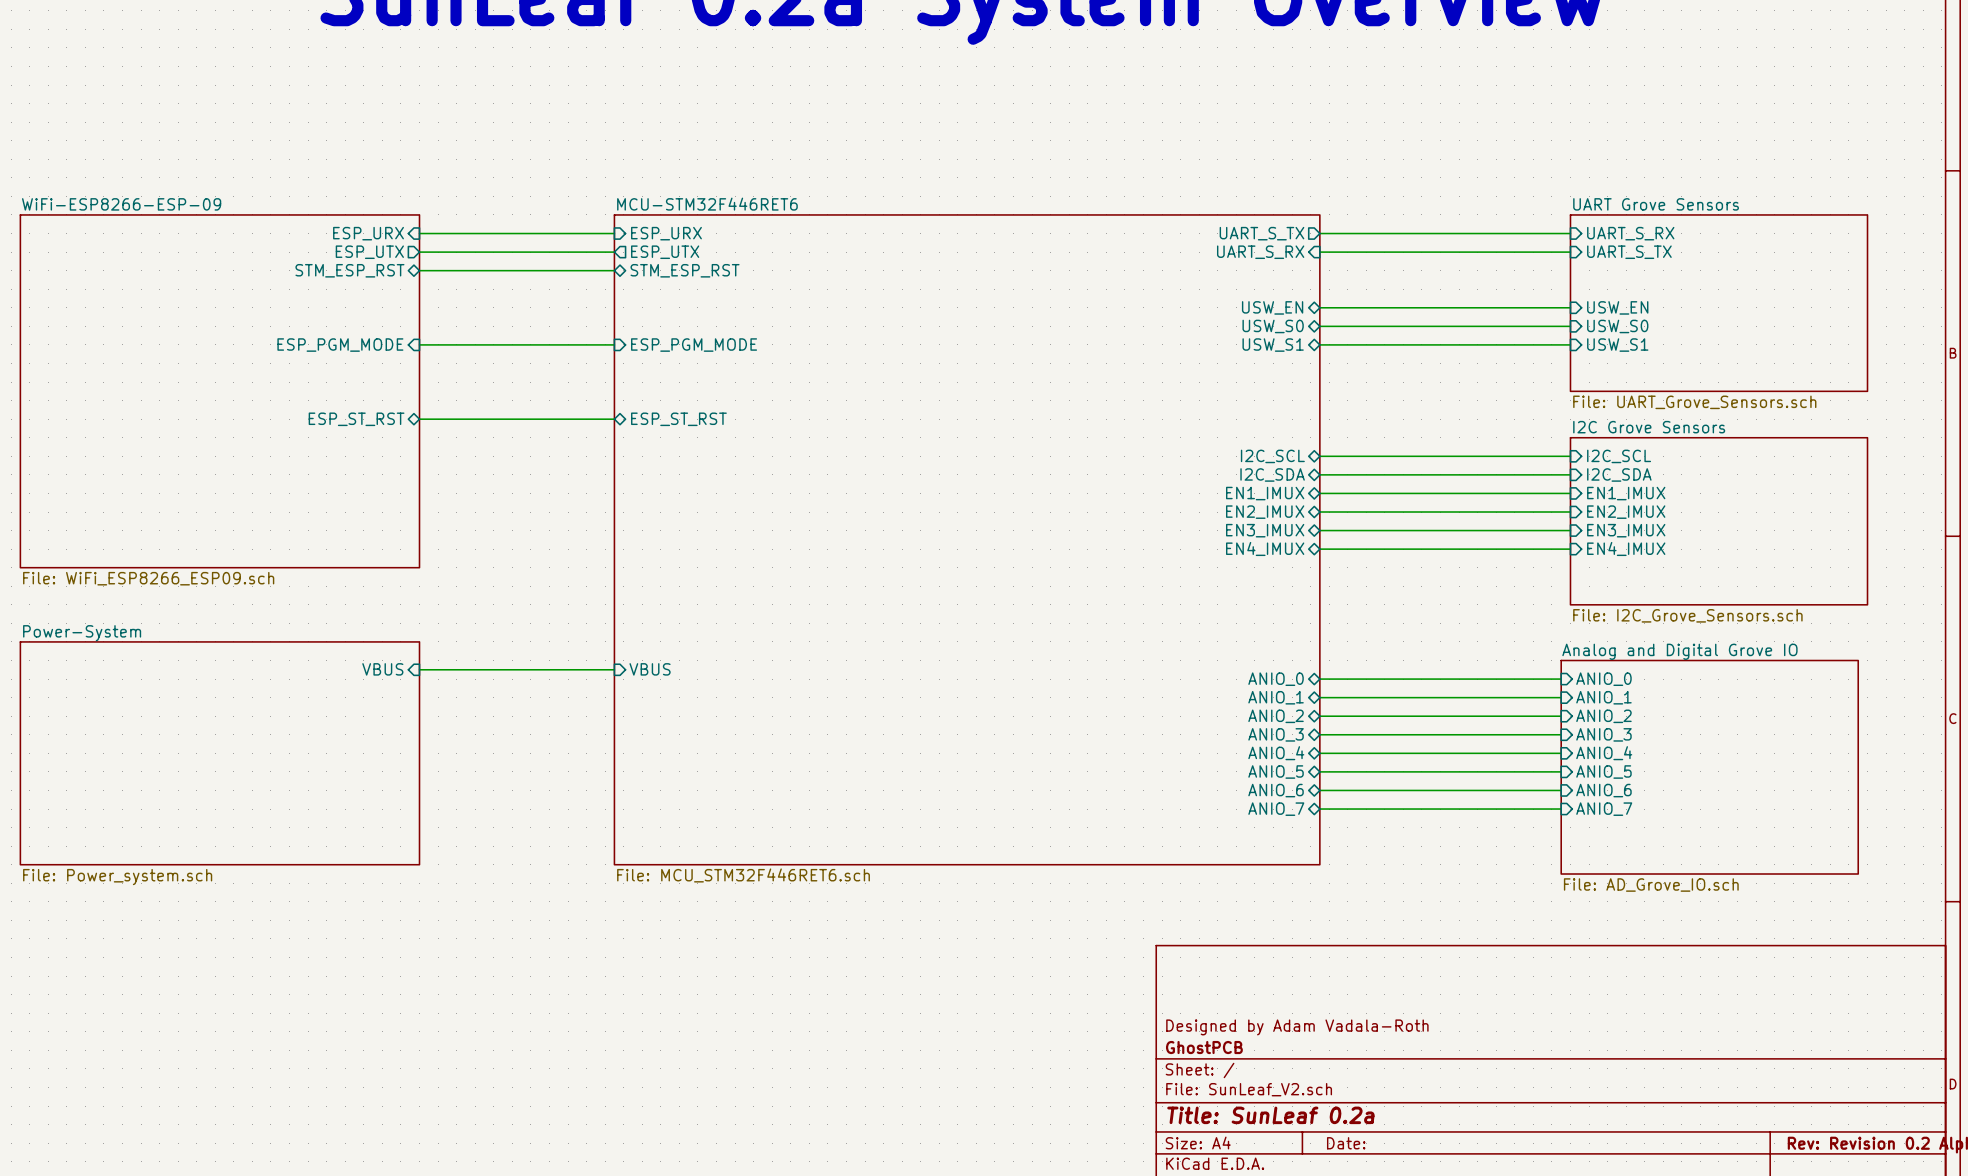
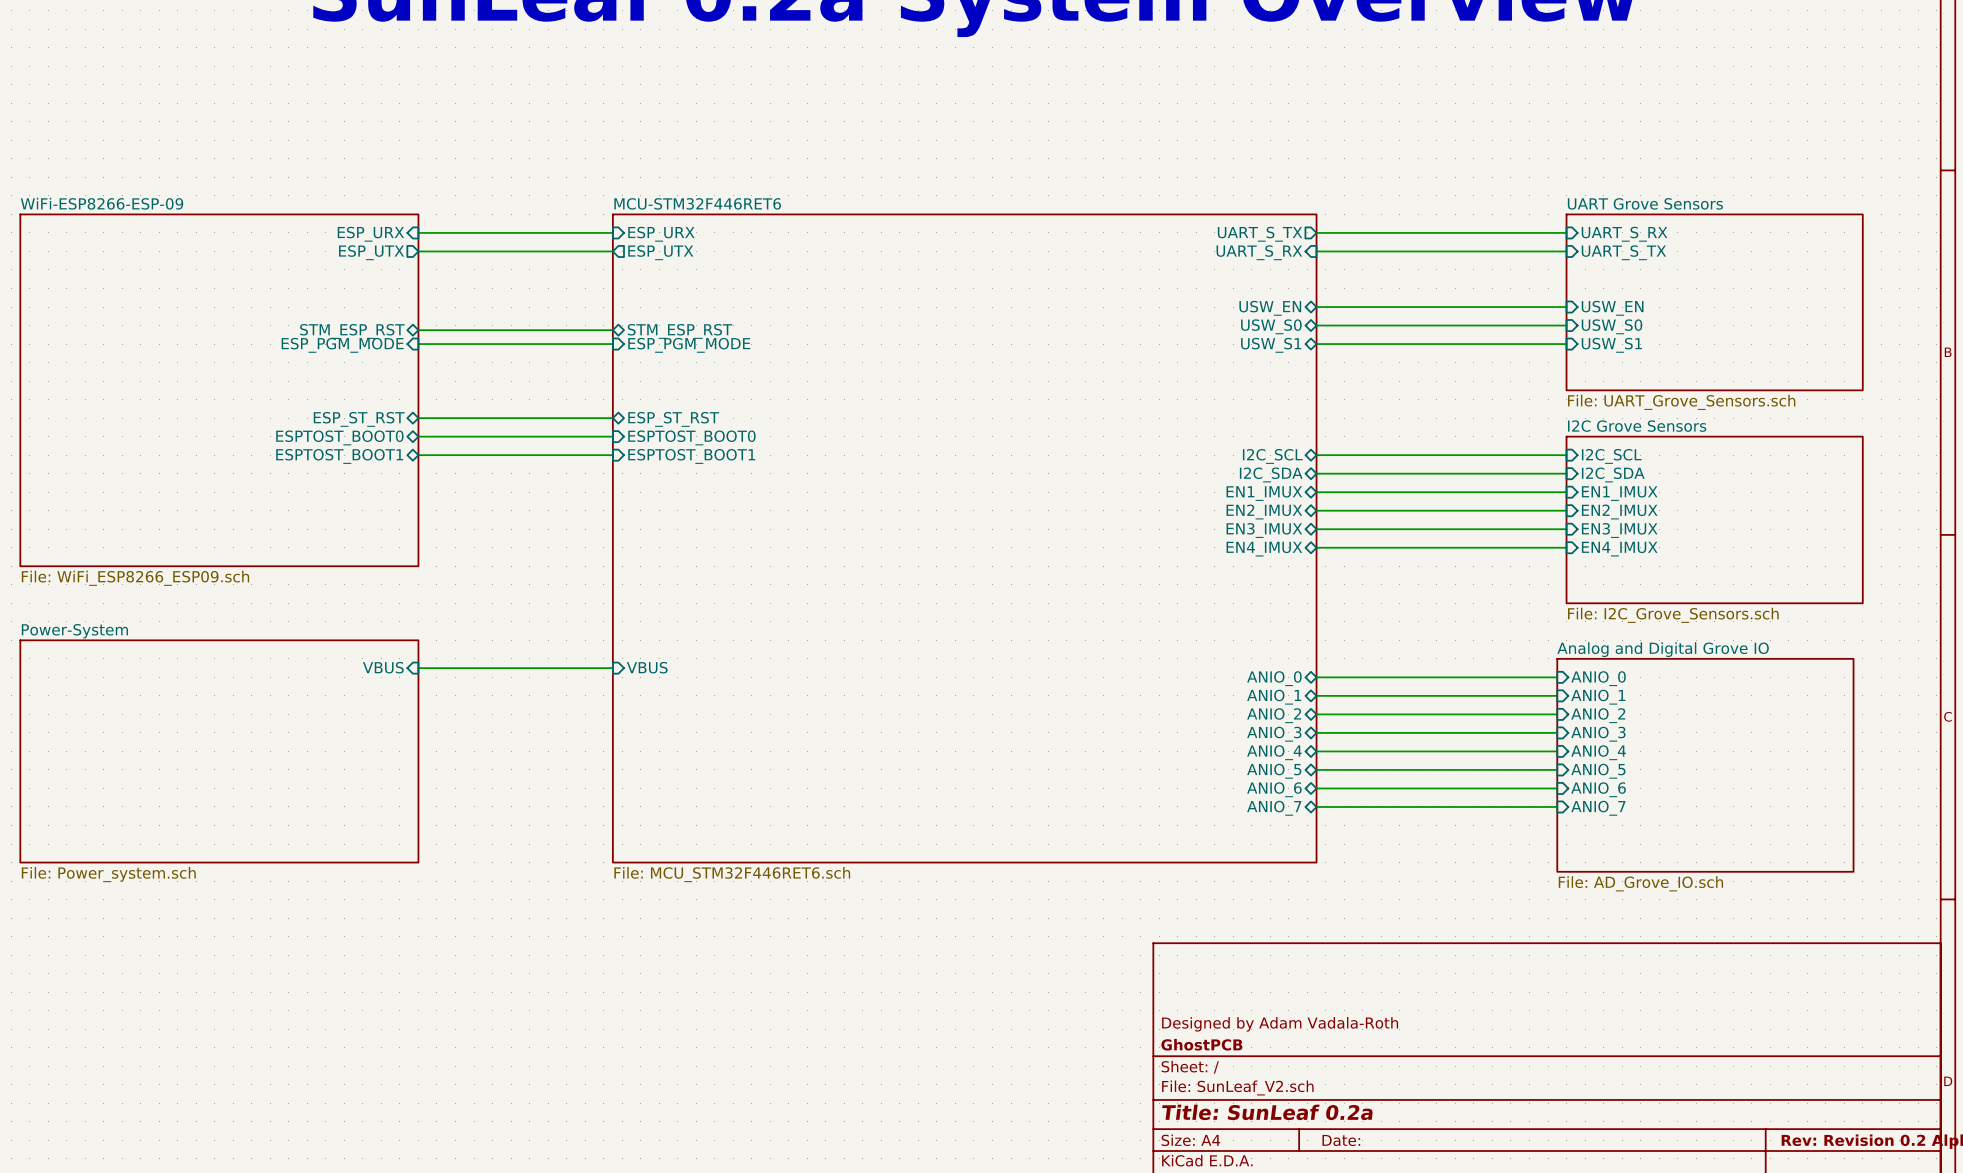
sheet pin position: STM_ESP_RST (349, 270) -> STM_ESP_RST (352, 331)
wire: (419, 270) (614, 270) -> (418, 330) (612, 330)
sheet pin position: STM_ESP_RST (685, 270) -> STM_ESP_RST (680, 331)
sheet pin: none -> ESPTOST_BOOT0 (339, 437)
wire: none -> (418, 436) (612, 436)
sheet pin: none -> ESPTOST_BOOT0 (691, 437)
sheet pin: none -> ESPTOST_BOOT1 (339, 456)
wire: none -> (418, 455) (612, 455)
sheet pin: none -> ESPTOST_BOOT1 (691, 456)

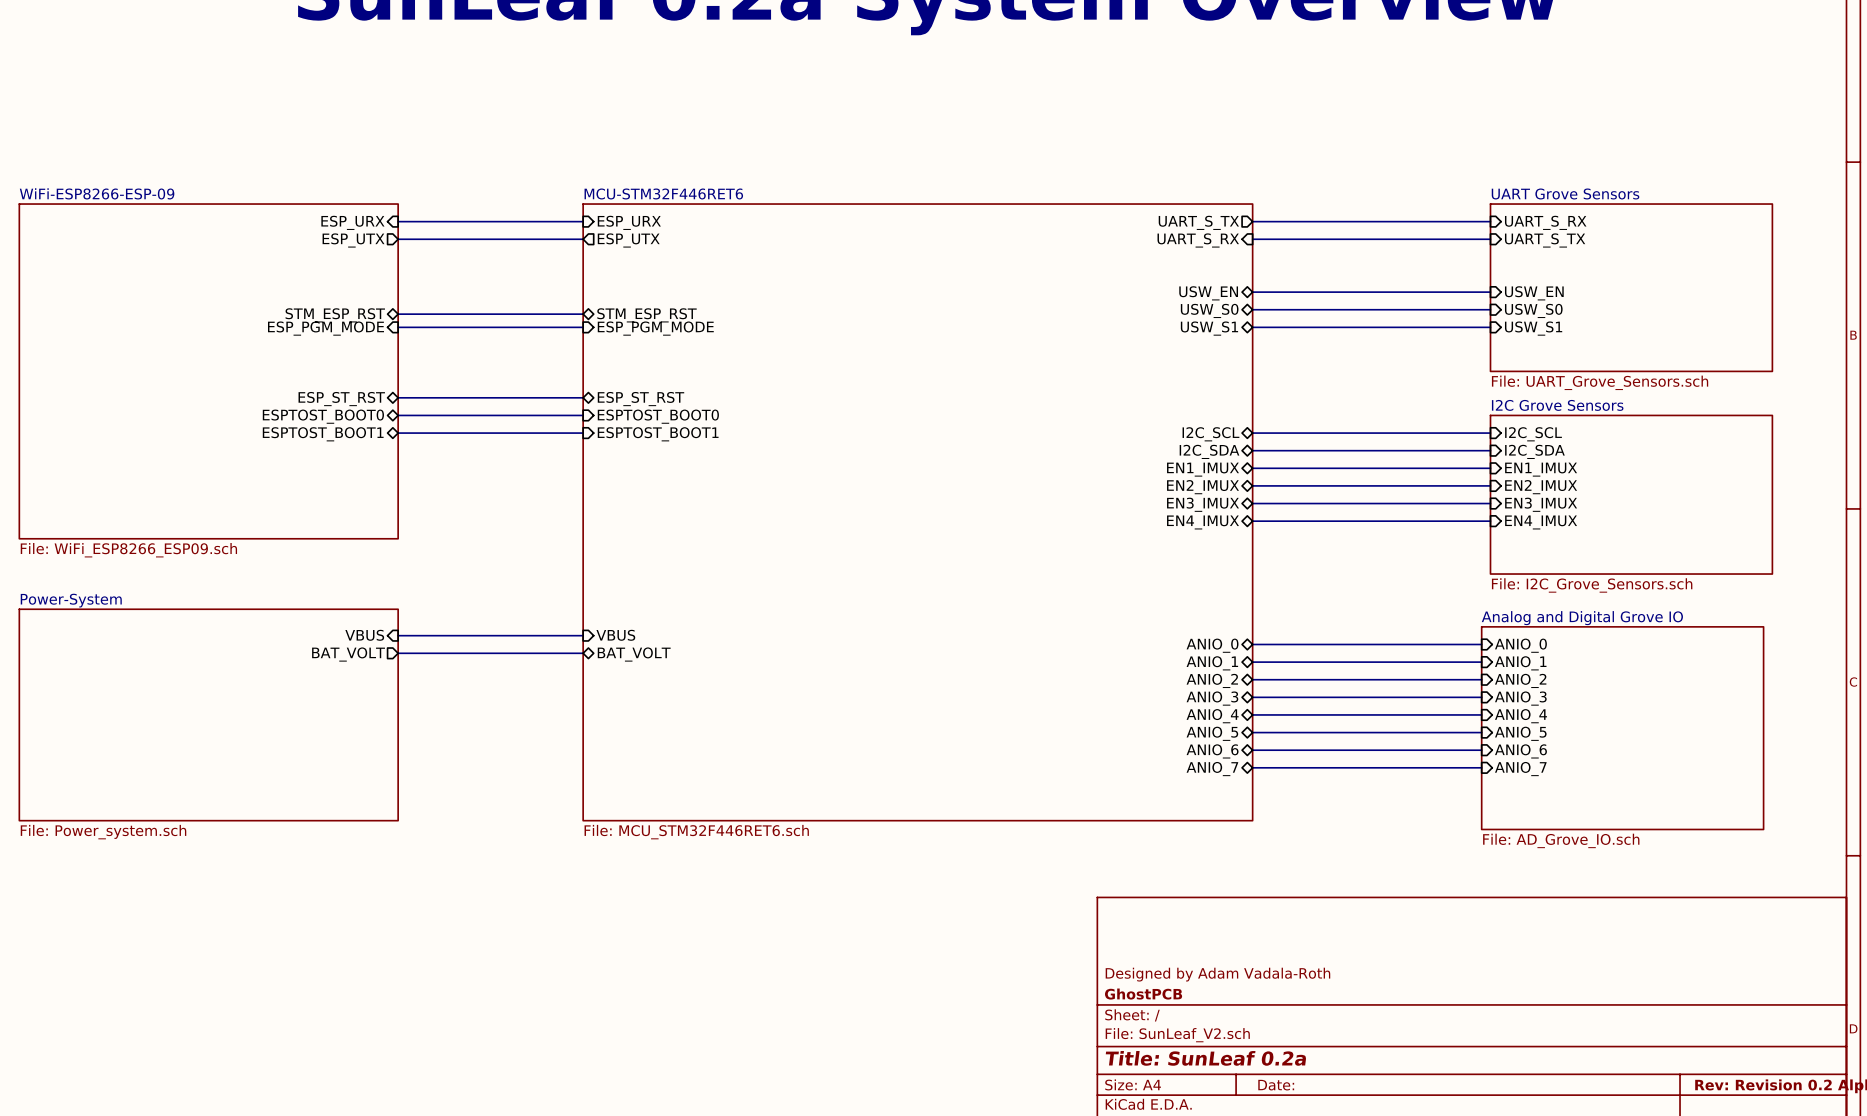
wire: none -> (398, 653) (583, 653)
sheet pin: none -> BAT_VOLT (348, 654)
sheet pin: none -> BAT_VOLT (634, 654)

